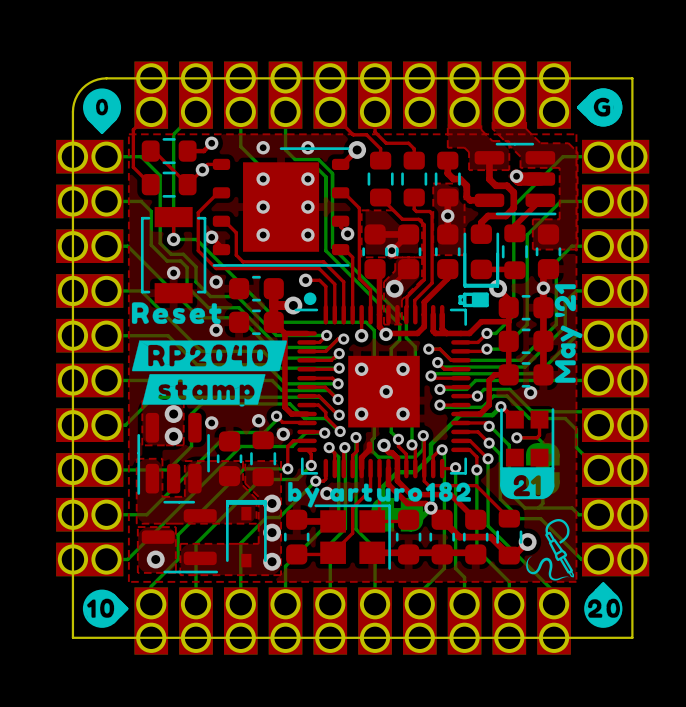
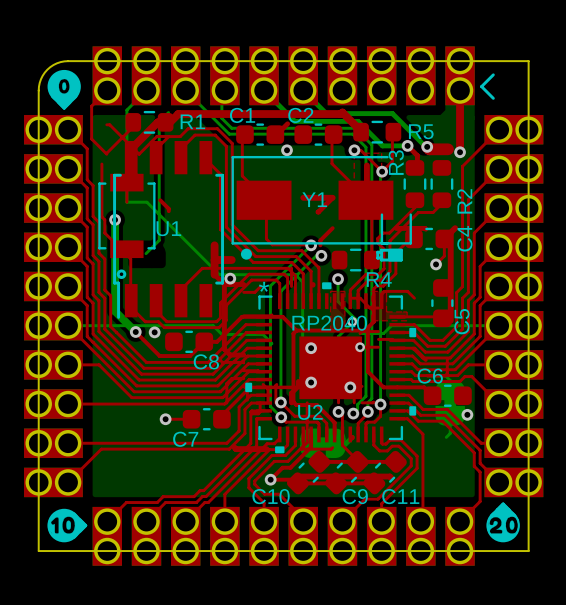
drawing: [577, 88, 623, 127] -> none
bottom track: (240, 95) (240, 146) (260, 166) (315, 166) (325, 176) (325, 250) (399, 324) (399, 340) (391, 348) (391, 376) (399, 384) (399, 396) (391, 404) (391, 432) (398, 439) -> none
bottom track: none -> (185, 90) (229, 134) (352, 134) (365, 147) (365, 396) (357, 404) (357, 409) (353, 413)
bottom track: (285, 111) (285, 149) (295, 159) (318, 159) (332, 173) (332, 247) (406, 321) (406, 337) (415, 346) (415, 392) -> (338, 279) (338, 301) (355, 319) (338, 336)
top track: (330, 111) (353, 134) (366, 134) (380, 148) (380, 160) -> none
bottom track: none -> (264, 90) (294, 121) (358, 121) (382, 145) (407, 145)
top track: (375, 111) (375, 132) (386, 143) (408, 143) (414, 148) (414, 160) -> none
bottom track: none -> (303, 90) (326, 113) (392, 113) (424, 145)
top track: none -> (460, 90) (460, 152)
bottom track: none -> (221, 93) (221, 118) (231, 128) (355, 128) (371, 144) (371, 398) (367, 402) (367, 411)
top zone outline: (492, 122) (492, 128) (520, 156) (520, 167) (559, 167) (559, 219) (532, 219) (532, 249) (577, 249) (577, 152) (568, 143) (540, 143) (526, 128) (526, 122) (492, 122) -> none
top zone outline: (447, 125) (447, 147) (464, 147) (469, 152) (469, 170) (509, 170) (509, 141) (492, 141) (481, 129) (481, 125) (447, 125) -> none
top zone outline: (128, 134) (128, 581) (576, 581) (576, 134) (128, 134) -> none
bottom track: none -> (168, 112) (159, 121) (159, 240) (146, 253)
top track: (211, 143) (203, 151) (187, 151) -> none
via: (211, 143) -> none
via: (263, 147) -> none
via: (307, 147) -> none
R1: none -> (149, 122)
top track: none -> (165, 122) (157, 122) (131, 148) (131, 157)
via: (357, 149) -> none
part: (169, 151) -> none
top track: none -> (135, 124) (106, 153)
top track: none -> (167, 124) (178, 114) (342, 112) (360, 130)
top track: none -> (68, 129) (87, 148) (87, 179) (93, 185) (93, 216) (98, 222) (98, 253) (104, 259) (104, 289) (110, 295) (110, 326) (146, 362) (208, 362) (245, 324) (264, 324)
bottom track: (106, 156) (141, 156) (160, 175) (160, 243) (171, 254) (183, 254) (196, 266) (196, 282) (210, 296) (237, 296) (276, 335) (326, 335) -> none
top track: none -> (499, 129) (462, 166) (462, 286) (456, 292) (456, 326) (442, 340) (430, 340) (414, 324) (397, 324)
bottom track: (598, 156) (563, 156) (513, 205) (513, 315) (495, 333) (486, 333) -> none
top track: none -> (242, 130) (242, 175) (266, 200) (266, 238) (272, 244) (311, 245)
top track: none -> (331, 130) (331, 163) (368, 200)
top track: none -> (392, 130) (392, 161) (382, 171) (360, 150) (354, 150)
top track: (489, 157) (489, 179) (495, 185) (507, 185) (513, 192) (513, 208) (505, 215) (488, 215) (481, 222) (481, 234) -> none
R5: none -> (377, 132)
top track: (447, 160) (447, 173) (453, 179) (460, 179) (466, 185) (466, 196) (470, 200) (489, 200) -> none
C1: none -> (260, 134)
C2: none -> (318, 134)
via: (202, 169) -> none
top track: none -> (407, 145) (417, 155) (417, 167)
via: none -> (407, 145)
top track: none -> (180, 149) (195, 135) (215, 135) (226, 146) (226, 227) (255, 256) (296, 256) (311, 271) (311, 301)
top track: none -> (156, 149) (168, 136) (180, 136) (188, 128) (217, 128) (232, 143) (232, 224) (258, 250) (301, 250) (318, 267) (318, 301)
via: (263, 179) -> none
via: (307, 179) -> none
part: (380, 179) -> none
part: (414, 179) -> none
part: (447, 179) -> none
part: (515, 179) -> none
via: none -> (287, 150)
via: none -> (354, 150)
via: none -> (460, 152)
part: (169, 184) -> none
top track: none -> (205, 159) (220, 174) (220, 229) (253, 262) (292, 262) (303, 273) (303, 301)
top track: (221, 192) (218, 192) (198, 212) (198, 250) (216, 268) (319, 268) (334, 284) (334, 314) -> none
top track: (340, 192) (344, 192) (359, 208) (359, 278) (370, 289) (370, 314) -> none
top track: none -> (101, 164) (101, 216) (104, 219) (104, 233) (130, 258) (130, 302)
top track: (414, 197) (414, 209) (416, 211) (429, 211) (432, 213) (432, 283) (414, 300) (415, 314) -> none
top track: (384, 199) (380, 197) (402, 219) (418, 219) (424, 224) (424, 279) (406, 297) (406, 314) -> none
top track: (540, 200) (514, 225) (514, 233) -> none
top track: none -> (68, 168) (87, 188) (87, 218) (93, 224) (93, 255) (98, 261) (98, 292) (104, 298) (104, 329) (143, 368) (210, 368) (246, 332) (264, 332)
bottom track: (106, 201) (141, 201) (151, 211) (151, 245) (167, 261) (180, 261) (187, 267) (187, 286) (208, 307) (239, 307) (278, 347) (329, 347) (338, 339) (343, 339) -> none
top track: none -> (499, 168) (468, 199) (468, 292) (462, 298) (462, 329) (445, 346) (427, 346) (413, 332) (397, 332)
bottom track: (598, 201) (560, 201) (527, 235) (527, 324) (502, 349) (486, 349) -> none
bottom track: none -> (382, 171) (380, 173) (380, 404)
via: none -> (382, 171)
via: (263, 207) -> none
part: (281, 207) -> none
via: (307, 207) -> none
via: (447, 215) -> none
R3: none -> (414, 184)
R2: none -> (441, 184)
top track: (221, 221) (224, 221) (236, 232) (236, 255) (243, 261) (323, 261) (343, 282) (343, 314) -> none
via: (347, 233) -> none
via: (263, 235) -> none
via: (307, 235) -> none
via: (211, 237) -> none
Y1: none -> (312, 200)
top track: none -> (414, 200) (414, 207) (389, 233) (383, 233) (377, 238) (377, 242) (384, 249) (384, 268) (378, 274) (366, 274) (350, 290) (350, 301)
top track: none -> (445, 200) (433, 212) (418, 212) (389, 240) (389, 271) (381, 280) (368, 280) (358, 290) (358, 301)
via: (173, 239) -> none
top track: none -> (371, 203) (371, 260)
top track: none -> (68, 208) (87, 227) (87, 258) (93, 263) (93, 294) (98, 300) (98, 331) (141, 374) (213, 374) (246, 340) (264, 340)
bottom track: (106, 246) (127, 246) (199, 317) (239, 317) (279, 358) (334, 358) (339, 353) -> none
top track: none -> (499, 208) (474, 233) (474, 294) (468, 300) (468, 331) (447, 352) (425, 352) (413, 340) (397, 340)
bottom track: (598, 246) (571, 246) (556, 261) (556, 324) (520, 360) (451, 360) (439, 349) (428, 349) -> none
top track: (340, 249) (344, 249) (352, 257) (352, 314) -> none
via: (391, 250) -> none
part: (375, 251) -> none
part: (408, 251) -> none
part: (447, 251) -> none
part: (514, 251) -> none
part: (548, 251) -> none
part: (481, 255) -> none
top zone outline: (395, 257) (395, 270) (384, 282) (384, 324) (401, 324) (401, 299) (422, 279) (422, 219) (401, 219) (392, 210) (361, 210) (361, 257) (422, 257) -> none
bottom track: none -> (115, 219) (115, 311) (135, 332)
via: none -> (115, 219)
top track: (375, 269) (379, 273) (379, 326) (386, 333) (417, 333) (424, 326) (424, 302) (447, 278) (447, 269) -> none
U1: none -> (168, 229)
via: (173, 273) -> none
top track: (305, 280) (319, 280) (325, 286) (325, 314) -> none
via: (305, 280) -> none
top track: none -> (410, 238) (395, 253) (395, 273) (383, 286) (376, 286) (373, 288) (373, 321) (364, 330) (296, 330)
C4: none -> (429, 238)
top track: none -> (444, 238) (444, 256) (436, 264)
via: (216, 282) -> none
drawing: [554, 284, 583, 383] -> none
part: (256, 288) -> none
bottom track: none -> (311, 245) (270, 286) (270, 406) (281, 417)
via: none -> (311, 245)
via: (394, 288) -> none
top track: (498, 288) (508, 299) (508, 374) (494, 374) (489, 380) (489, 405) (480, 414) (460, 414) -> none
via: (498, 288) -> none
via position: (543, 288) -> (436, 264)
top track: none -> (68, 247) (87, 266) (87, 297) (93, 303) (93, 333) (139, 380) (215, 380) (247, 348) (264, 348)
bottom track: (106, 290) (141, 290) (201, 351) (263, 351) (279, 368) (339, 368) -> none
top track: none -> (499, 247) (480, 266) (480, 297) (474, 303) (474, 334) (450, 357) (422, 357) (413, 348) (397, 348)
bottom track: (598, 290) (576, 290) (565, 302) (565, 326) (524, 367) (442, 367) (437, 362) -> none
bottom track: none -> (321, 255) (316, 255) (280, 291) (280, 402)
via: none -> (321, 255)
drawing shape: [131, 302, 222, 324] -> [116, 269, 127, 279]
via: (293, 305) -> none
R4: none -> (355, 260)
part: (526, 307) -> none
top track: (433, 314) (433, 331) (435, 333) (469, 333) (481, 321) (508, 321) -> none
top track: (442, 314) (442, 328) (446, 333) -> none
part: (256, 322) -> none
via: none -> (230, 278)
via: none -> (338, 279)
via: (216, 330) -> none
top track: (486, 333) (477, 342) (460, 342) -> none
via: (486, 333) -> none
via: (386, 334) -> none
top track: none -> (68, 286) (87, 305) (87, 336) (136, 385) (217, 385) (247, 356) (264, 356)
bottom track: (106, 335) (168, 335) (197, 364) (266, 364) (285, 383) (338, 383) -> none
via: (326, 335) -> none
via: (361, 335) -> none
top track: none -> (499, 286) (480, 305) (480, 336) (452, 363) (420, 363) (412, 356) (397, 356)
bottom track: (598, 335) (576, 335) (538, 373) (433, 373) (430, 375) -> none
top track: none -> (180, 289) (202, 268) (288, 268) (295, 275) (295, 301)
top track: (343, 339) (338, 339) (325, 351) (307, 351) -> none
via: (343, 339) -> none
drawing: [131, 340, 287, 407] -> none
top zone outline: none -> (330, 291) (330, 331) (344, 331) (344, 291) (330, 291)
top zone outline: none -> (371, 291) (386, 291) (386, 311) (407, 311) (407, 320) (371, 320) (371, 291)
part: (526, 341) -> none
via: (428, 349) -> none
top track: (486, 349) (484, 351) (460, 351) -> none
via: (486, 349) -> none
top track: none -> (414, 298) (407, 291) (384, 291) (381, 294) (381, 301)
top track: none -> (131, 300) (131, 307) (145, 321) (158, 321) (164, 327) (219, 327) (226, 320) (226, 305) (251, 280) (276, 280) (279, 283) (279, 301)
top track: none -> (156, 300) (156, 310) (166, 321) (216, 321) (220, 317) (220, 302) (249, 274) (284, 274) (287, 277) (287, 301)
top track: (339, 353) (331, 360) (307, 360) -> none
via: (339, 353) -> none
C5: none -> (442, 303)
top track: (437, 362) (444, 369) (460, 369) -> none
via: (437, 362) -> none
via: (339, 368) -> none
via: (361, 369) -> none
via: (403, 369) -> none
top track: none -> (397, 316) (440, 316)
part: (526, 374) -> none
top track: (430, 375) (433, 378) (460, 378) -> none
top track: (307, 378) (332, 378) (338, 383) -> none
top track: none -> (68, 325) (134, 391) (220, 391) (248, 363) (264, 363)
top track: none -> (499, 325) (455, 369) (417, 369) (412, 363) (397, 363)
via: (338, 383) -> none
top track: none -> (367, 328) (367, 371) (383, 387) (424, 387) (432, 395)
top track: none -> (296, 330) (293, 333) (293, 402) (296, 405) (316, 405) (334, 422) (334, 434)
top track: none -> (296, 330) (282, 316) (242, 316) (217, 341) (204, 341) (190, 356) (159, 356) (135, 332)
via: none -> (135, 332)
top track: (307, 387) (325, 387) (339, 401) -> none
via: none -> (154, 332)
via: (439, 389) -> none
part: (382, 391) -> none
via: (386, 391) -> none
via: (530, 392) -> none
top track: (307, 396) (319, 396) (339, 415) -> none
bottom track: (477, 396) (484, 389) (509, 389) (531, 410) (552, 410) -> none
via: (477, 396) -> none
C8: none -> (189, 341)
via: (338, 399) -> none
top zone outline: (142, 400) (142, 445) (183, 445) (183, 400) (142, 400) -> none
top track: (307, 405) (318, 405) (325, 412) (325, 417) (340, 431) -> none
bottom track: (439, 405) (442, 407) (482, 407) (493, 396) (507, 396) (529, 418) (565, 418) (576, 429) (576, 447) (598, 469) -> none
via: none -> (311, 348)
bottom track: (500, 406) (492, 415) (460, 415) (431, 444) (431, 456) (415, 472) (397, 472) (382, 486) (382, 503) -> none
via: (500, 406) -> none
bottom track: (553, 411) (585, 411) (598, 425) -> none
via: (173, 414) -> none
via: (361, 414) -> none
via: (403, 414) -> none
bottom track: (339, 415) (320, 397) (153, 397) (125, 425) (106, 425) -> none
via: (339, 415) -> none
bottom track: (276, 416) (276, 420) (264, 432) (229, 432) (146, 514) (106, 514) -> none
via: (276, 416) -> none
via: (258, 420) -> none
via: (211, 422) -> none
top track: (460, 422) (485, 422) (489, 426) -> none
top track: none -> (68, 364) (99, 364) (131, 397) (222, 397) (248, 371) (264, 371)
top track: none -> (499, 364) (468, 364) (457, 375) (415, 375) (411, 371) (397, 371)
bottom track: (489, 426) (509, 445) (509, 492) (524, 508) (571, 508) (578, 514) (598, 514) -> none
via: (489, 426) -> none
U2: none -> RP2040 (330, 367)
bottom track: (340, 431) (325, 418) (304, 418) (290, 403) (201, 403) (191, 414) (191, 446) (168, 469) (106, 469) -> none
via: (340, 431) -> none
top track: (460, 431) (477, 431) (489, 443) -> none
bottom track: (324, 433) (305, 433) (292, 446) (240, 446) (127, 559) (106, 559) -> none
via: (324, 433) -> none
via: (283, 434) -> none
top track: (423, 435) (424, 481) (428, 485) (476, 485) (509, 518) -> none
via: (423, 435) -> none
via: (173, 436) -> none
top track: (356, 437) (357, 450) (352, 455) (352, 468) -> none
bottom track: (356, 437) (356, 529) (375, 548) (375, 604) -> none
via: (356, 437) -> none
via: (516, 437) -> none
top track: (398, 439) (398, 446) (406, 454) (406, 468) -> none
via: (398, 439) -> none
part: (527, 439) -> none
top track: (460, 440) (470, 440) (488, 458) -> none
top track: none -> (264, 379) (249, 379) (224, 404) (68, 404)
top track: none -> (397, 379) (459, 381) (464, 376) (471, 376) (499, 404)
bottom track: (489, 443) (500, 454) (500, 499) (519, 518) (540, 518) (581, 559) (598, 559) -> none
via: (489, 443) -> none
via: (412, 444) -> none
top track: (384, 445) (389, 452) (391, 452) (397, 458) (397, 480) (411, 494) (450, 494) (475, 519) -> none
bottom track: (329, 447) (338, 457) (338, 513) (285, 566) (285, 604) -> none
via: (329, 447) -> none
bottom track: (344, 447) (345, 528) (330, 543) (330, 604) -> none
via: (344, 447) -> none
top track: none -> (293, 386) (250, 387) (225, 412) (225, 418)
bottom track: (442, 449) (444, 452) (444, 568) (419, 593) (419, 604) -> none
via: (442, 449) -> none
top track: (460, 449) (469, 449) (476, 457) (476, 469) -> none
via: none -> (350, 387)
part: (173, 453) -> none
top zone outline: (136, 458) (136, 523) (256, 523) (256, 499) (243, 485) (243, 461) (184, 461) (184, 496) (162, 496) (162, 458) (136, 458) -> none
part: (229, 458) -> none
part: (263, 458) -> none
bottom track: (488, 458) (488, 525) (554, 591) (554, 604) -> none
via: (488, 458) -> none
top track: none -> (264, 395) (250, 395) (239, 407) (239, 431) (226, 443) (68, 443)
top track: none -> (397, 395) (408, 395) (423, 409) (447, 409) (481, 443) (499, 443)
C6: none -> (447, 395)
top zone outline: (245, 461) (245, 483) (258, 496) (258, 543) (180, 543) (180, 575) (281, 575) (281, 461) (245, 461) -> none
bottom track: (311, 465) (297, 479) (260, 479) (196, 543) (196, 604) -> none
via: (311, 465) -> none
bottom track: (455, 467) (455, 568) (464, 577) (464, 604) -> none
via: (455, 467) -> none
drawing: [500, 467, 575, 581] -> none
bottom track: (287, 468) (244, 468) (178, 534) (178, 559) (151, 586) (151, 604) -> none
via: (287, 468) -> none
top track: none -> (264, 403) (251, 403) (244, 409) (244, 433) (229, 449) (101, 449) (68, 482)
top track: none -> (280, 402) (294, 416) (319, 416) (326, 423) (326, 434)
via: none -> (280, 402)
top track: (370, 468) (370, 490) (352, 508) (352, 533) (331, 554) (296, 554) -> none
top track: (388, 468) (388, 484) (407, 503) (425, 503) (459, 537) (490, 537) (509, 555) (514, 555) (527, 542) -> none
top track: none -> (397, 403) (408, 403) (420, 415) (445, 415) (480, 450) (480, 463) (499, 482)
bottom track: (476, 469) (476, 549) (509, 581) (509, 604) -> none
via: (476, 469) -> none
top track: none -> (380, 404) (380, 416) (374, 422) (365, 423) (365, 434)
via: none -> (380, 404)
top track: none -> (264, 410) (250, 411) (250, 443) (203, 490) (200, 490) (194, 496) (163, 496) (157, 502) (126, 502) (107, 521)
top track: none -> (397, 410) (407, 410) (418, 421) (442, 421) (474, 452) (474, 466) (480, 472) (480, 501) (460, 521)
top track: none -> (338, 411) (342, 415) (342, 445) (357, 460)
via: none -> (338, 411)
top track: none -> (367, 411) (358, 423) (358, 434)
via: none -> (367, 411)
via: none -> (353, 413)
drawing: [288, 481, 471, 508] -> none
bottom track: (315, 481) (279, 517) (266, 517) (240, 543) (240, 604) -> none
via: (315, 481) -> none
via: none -> (467, 414)
top track: none -> (281, 417) (286, 422) (317, 422) (318, 434)
via: none -> (281, 417)
top track: none -> (264, 418) (256, 418) (256, 445) (206, 496) (202, 496) (196, 502) (165, 502) (146, 521)
top track: none -> (397, 418) (407, 418) (422, 434) (422, 519)
top track: none -> (165, 419) (190, 419)
via: none -> (165, 419)
C7: none -> (206, 419)
via: (326, 493) -> none
via: (272, 503) -> none
top track: none -> (287, 434) (287, 445) (283, 449) (269, 449) (224, 494) (224, 521)
top track: none -> (295, 434) (295, 445) (285, 455) (272, 455) (248, 478) (248, 487) (264, 503) (264, 521)
top track: none -> (303, 434) (303, 446) (287, 461) (274, 461) (254, 481) (254, 484) (264, 494) (279, 494) (303, 518)
top track: none -> (311, 434) (311, 447) (290, 467) (282, 467) (270, 479) (294, 479)
top track: none -> (373, 434) (373, 445) (379, 450) (387, 450) (392, 446) (398, 446) (411, 458) (411, 465) (378, 499) (364, 499) (342, 521)
top track: none -> (381, 434) (382, 444) (385, 444) (389, 440) (401, 440) (417, 456) (417, 468) (381, 503) (381, 521)
line: (227, 505) (227, 501) (265, 501) (265, 505) -> none
via: (430, 508) -> none
top track: none -> (279, 438) (274, 443) (267, 443) (208, 502) (204, 502) (185, 521)
top zone outline: (137, 527) (137, 572) (175, 572) (175, 527) (137, 527) -> none
via: (272, 532) -> none
part: (246, 534) -> none
top track: none -> (319, 461) (395, 461)
part: (179, 537) -> none
part: (296, 537) -> none
part: (352, 537) -> none
part: (408, 537) -> none
part: (442, 537) -> none
part: (475, 537) -> none
part: (509, 537) -> none
via: (527, 542) -> none
C10: none -> (308, 472)
C9: none -> (346, 472)
C11: none -> (385, 472)
via: none -> (270, 479)
via: (155, 559) -> none
top track: none -> (297, 483) (374, 483)
via: (272, 561) -> none

